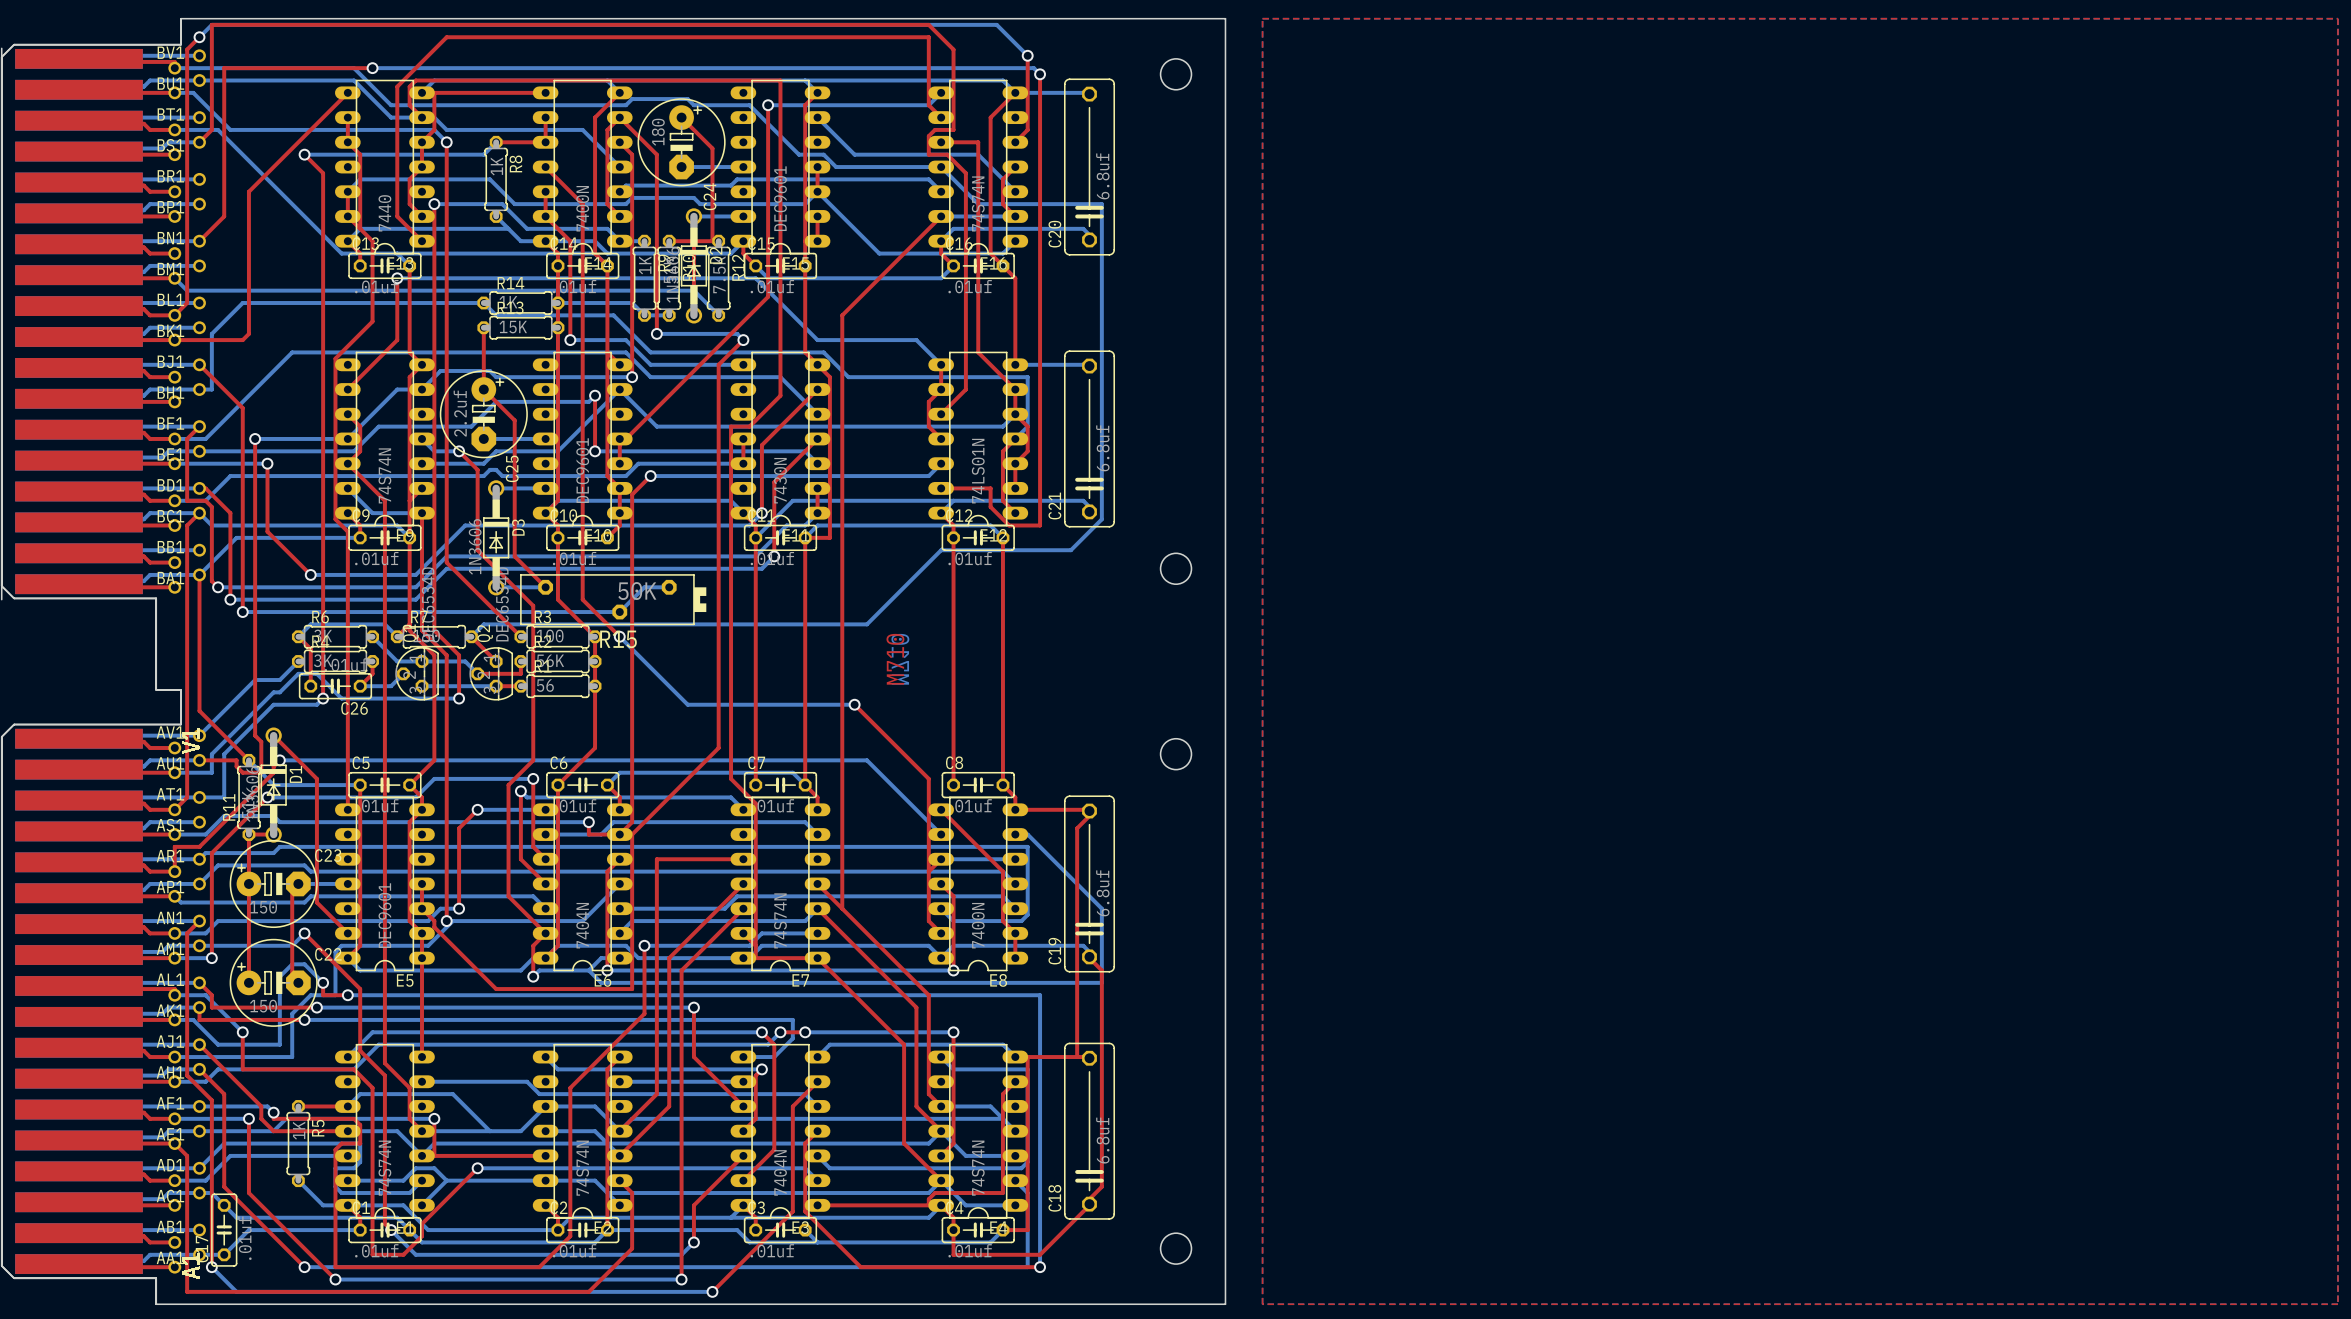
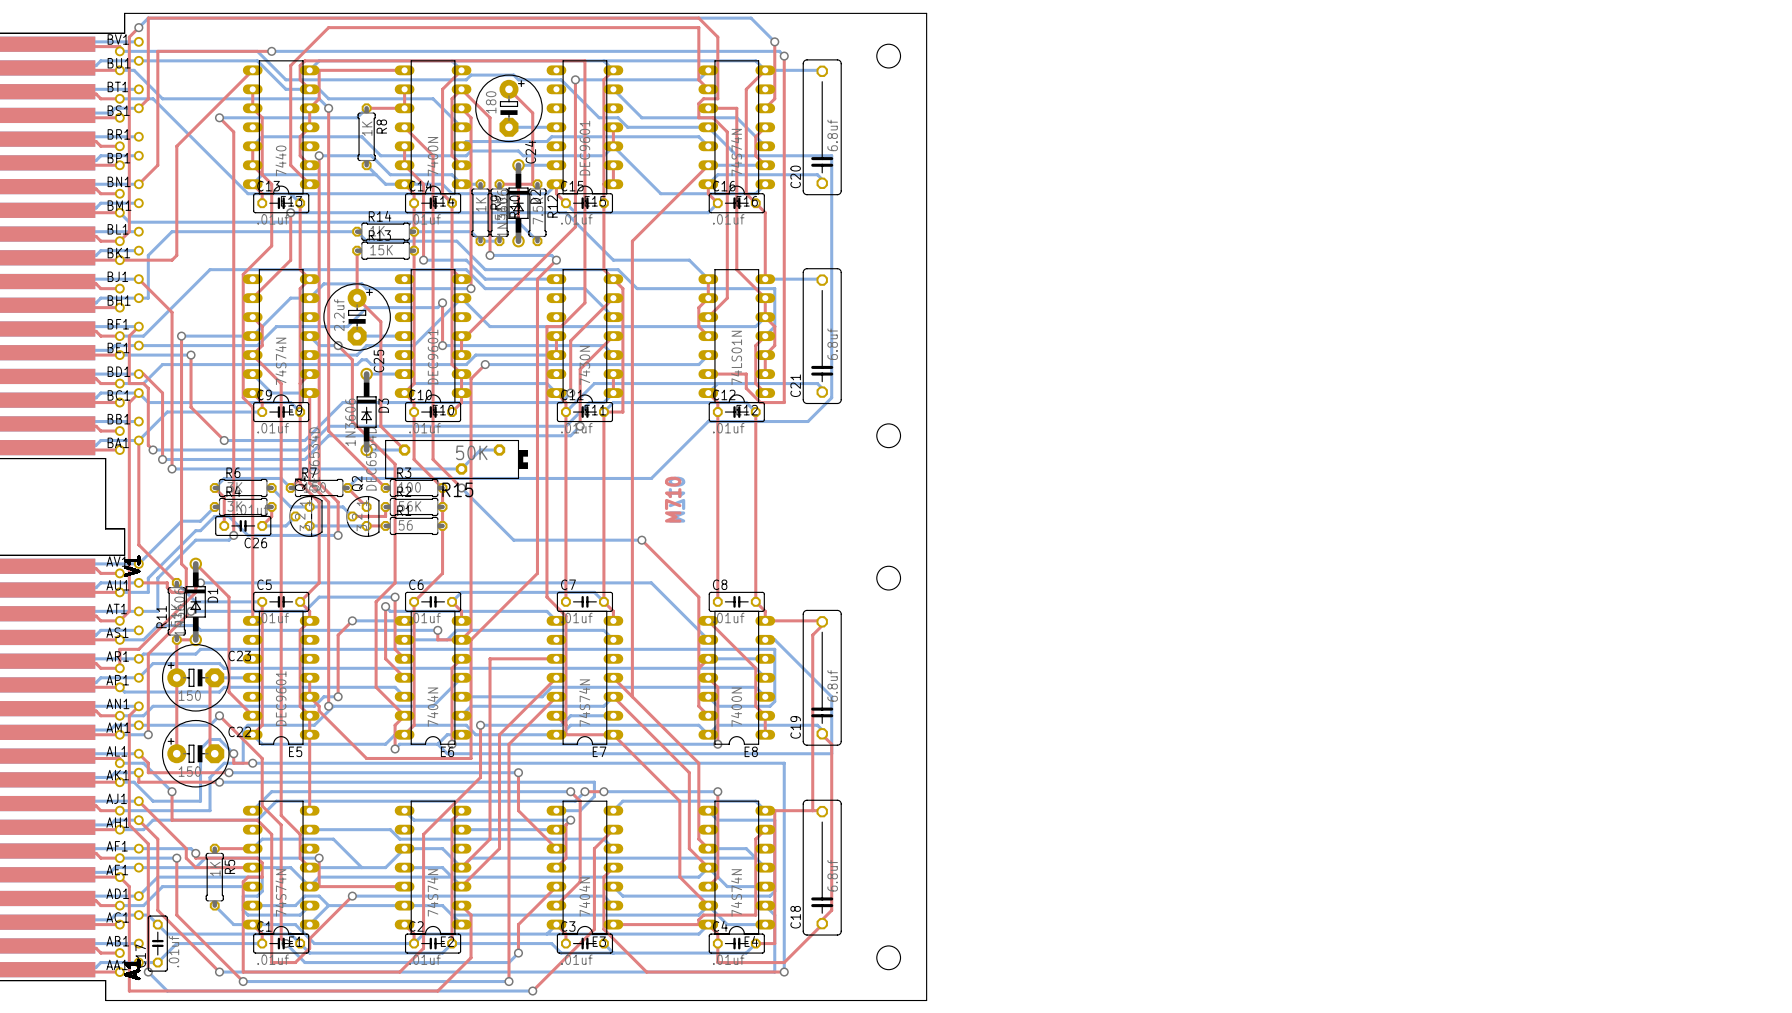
top zone outline: (1262, 18) (2337, 18) (2337, 1304) (1262, 1304) (1262, 18) -> none

